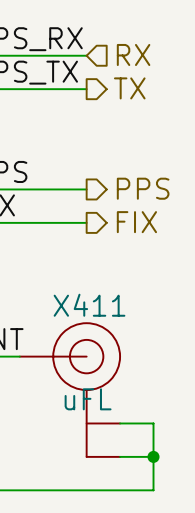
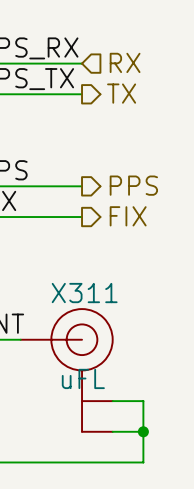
X411 name: X411 (89, 305) -> X311 (84, 293)

